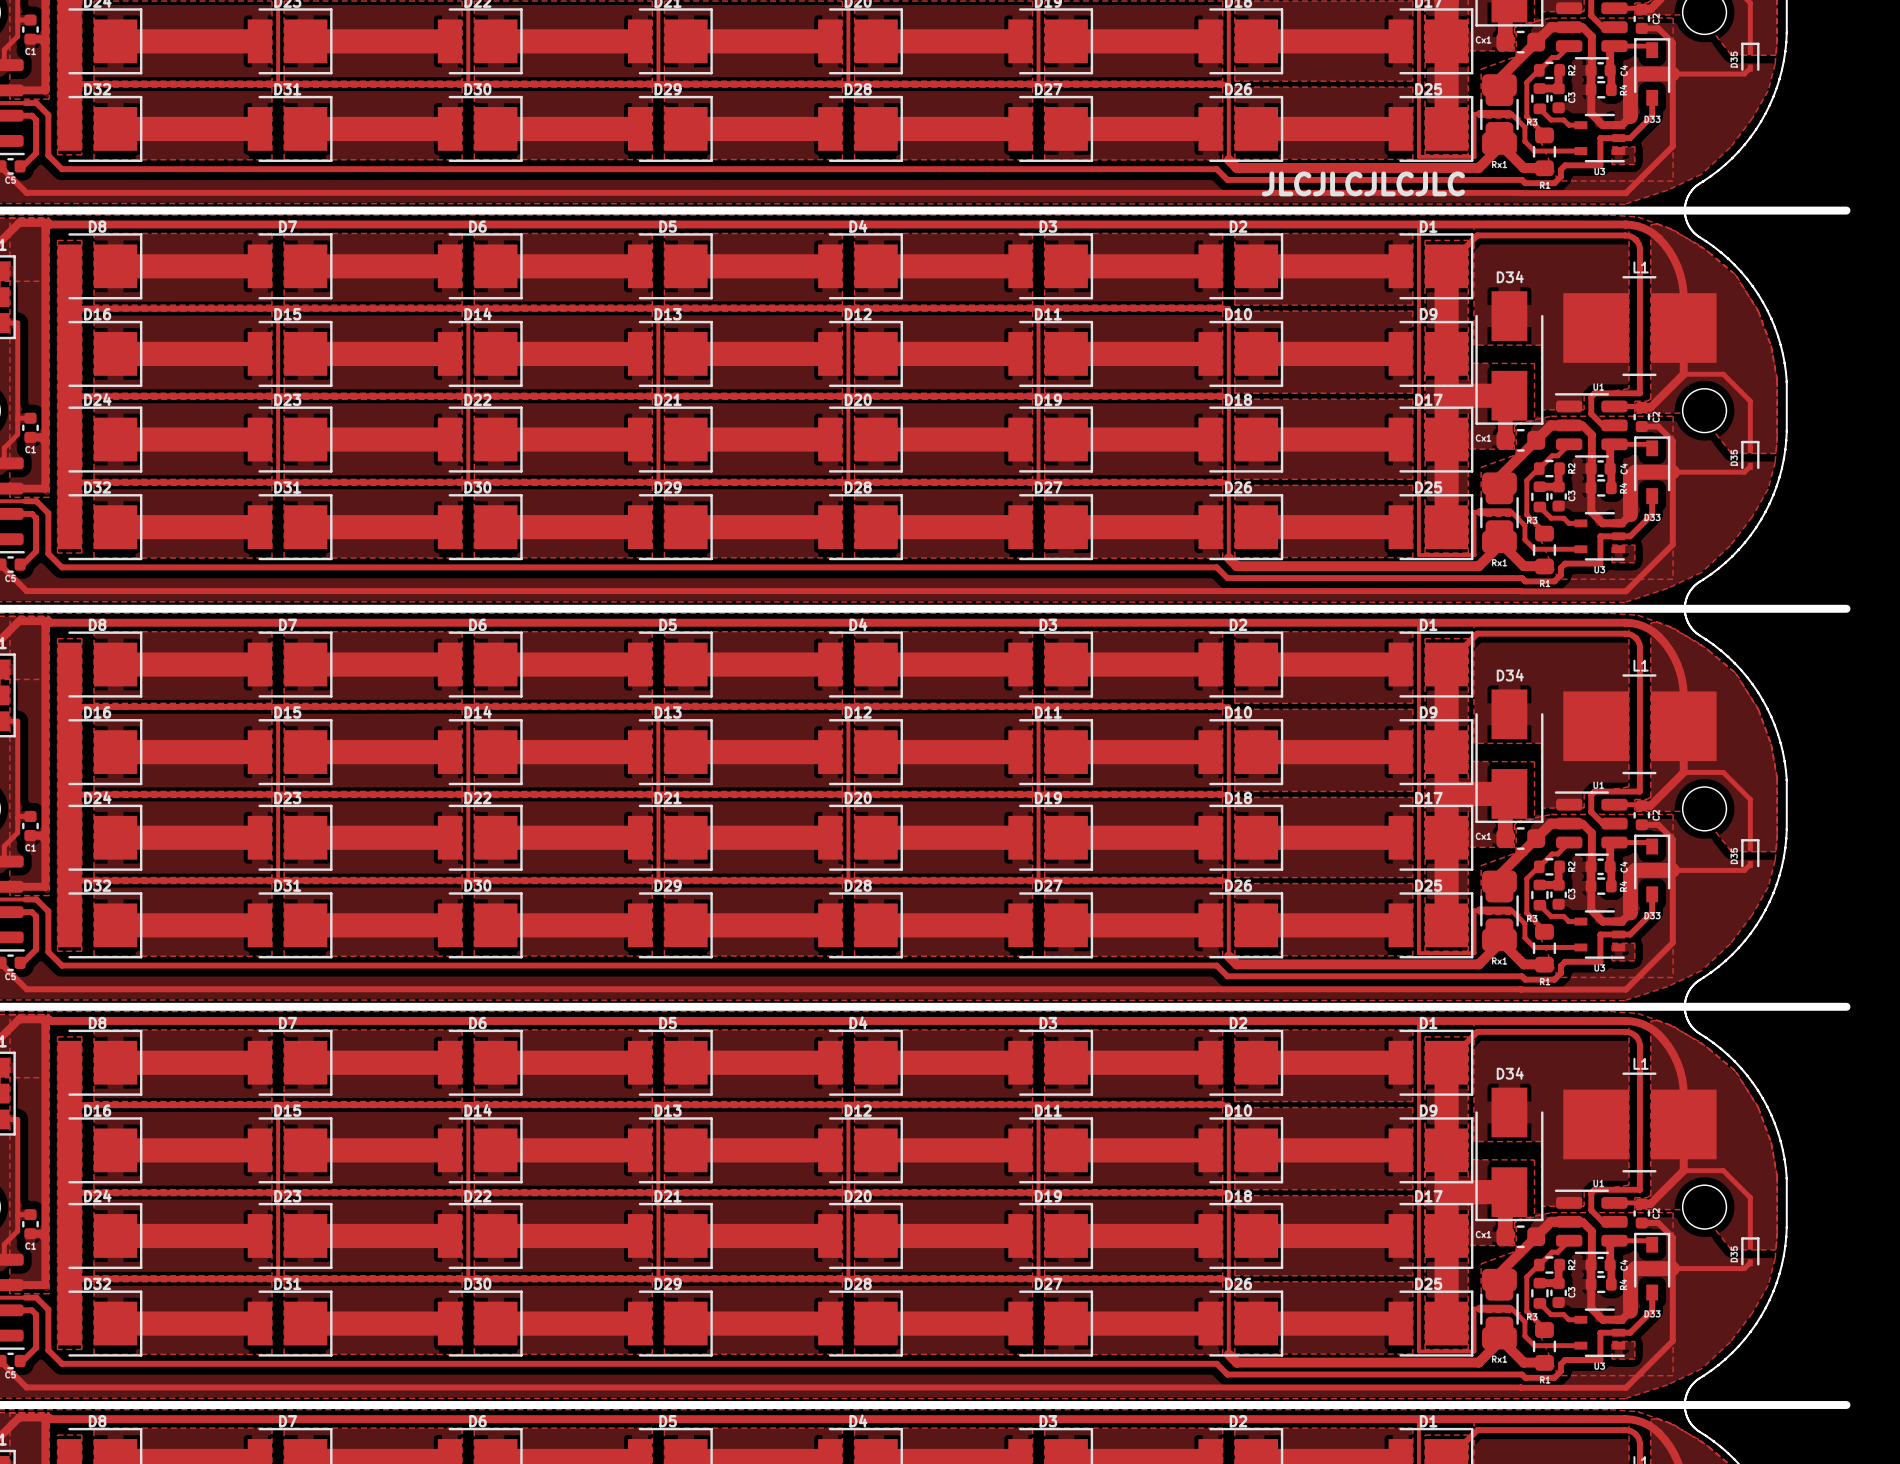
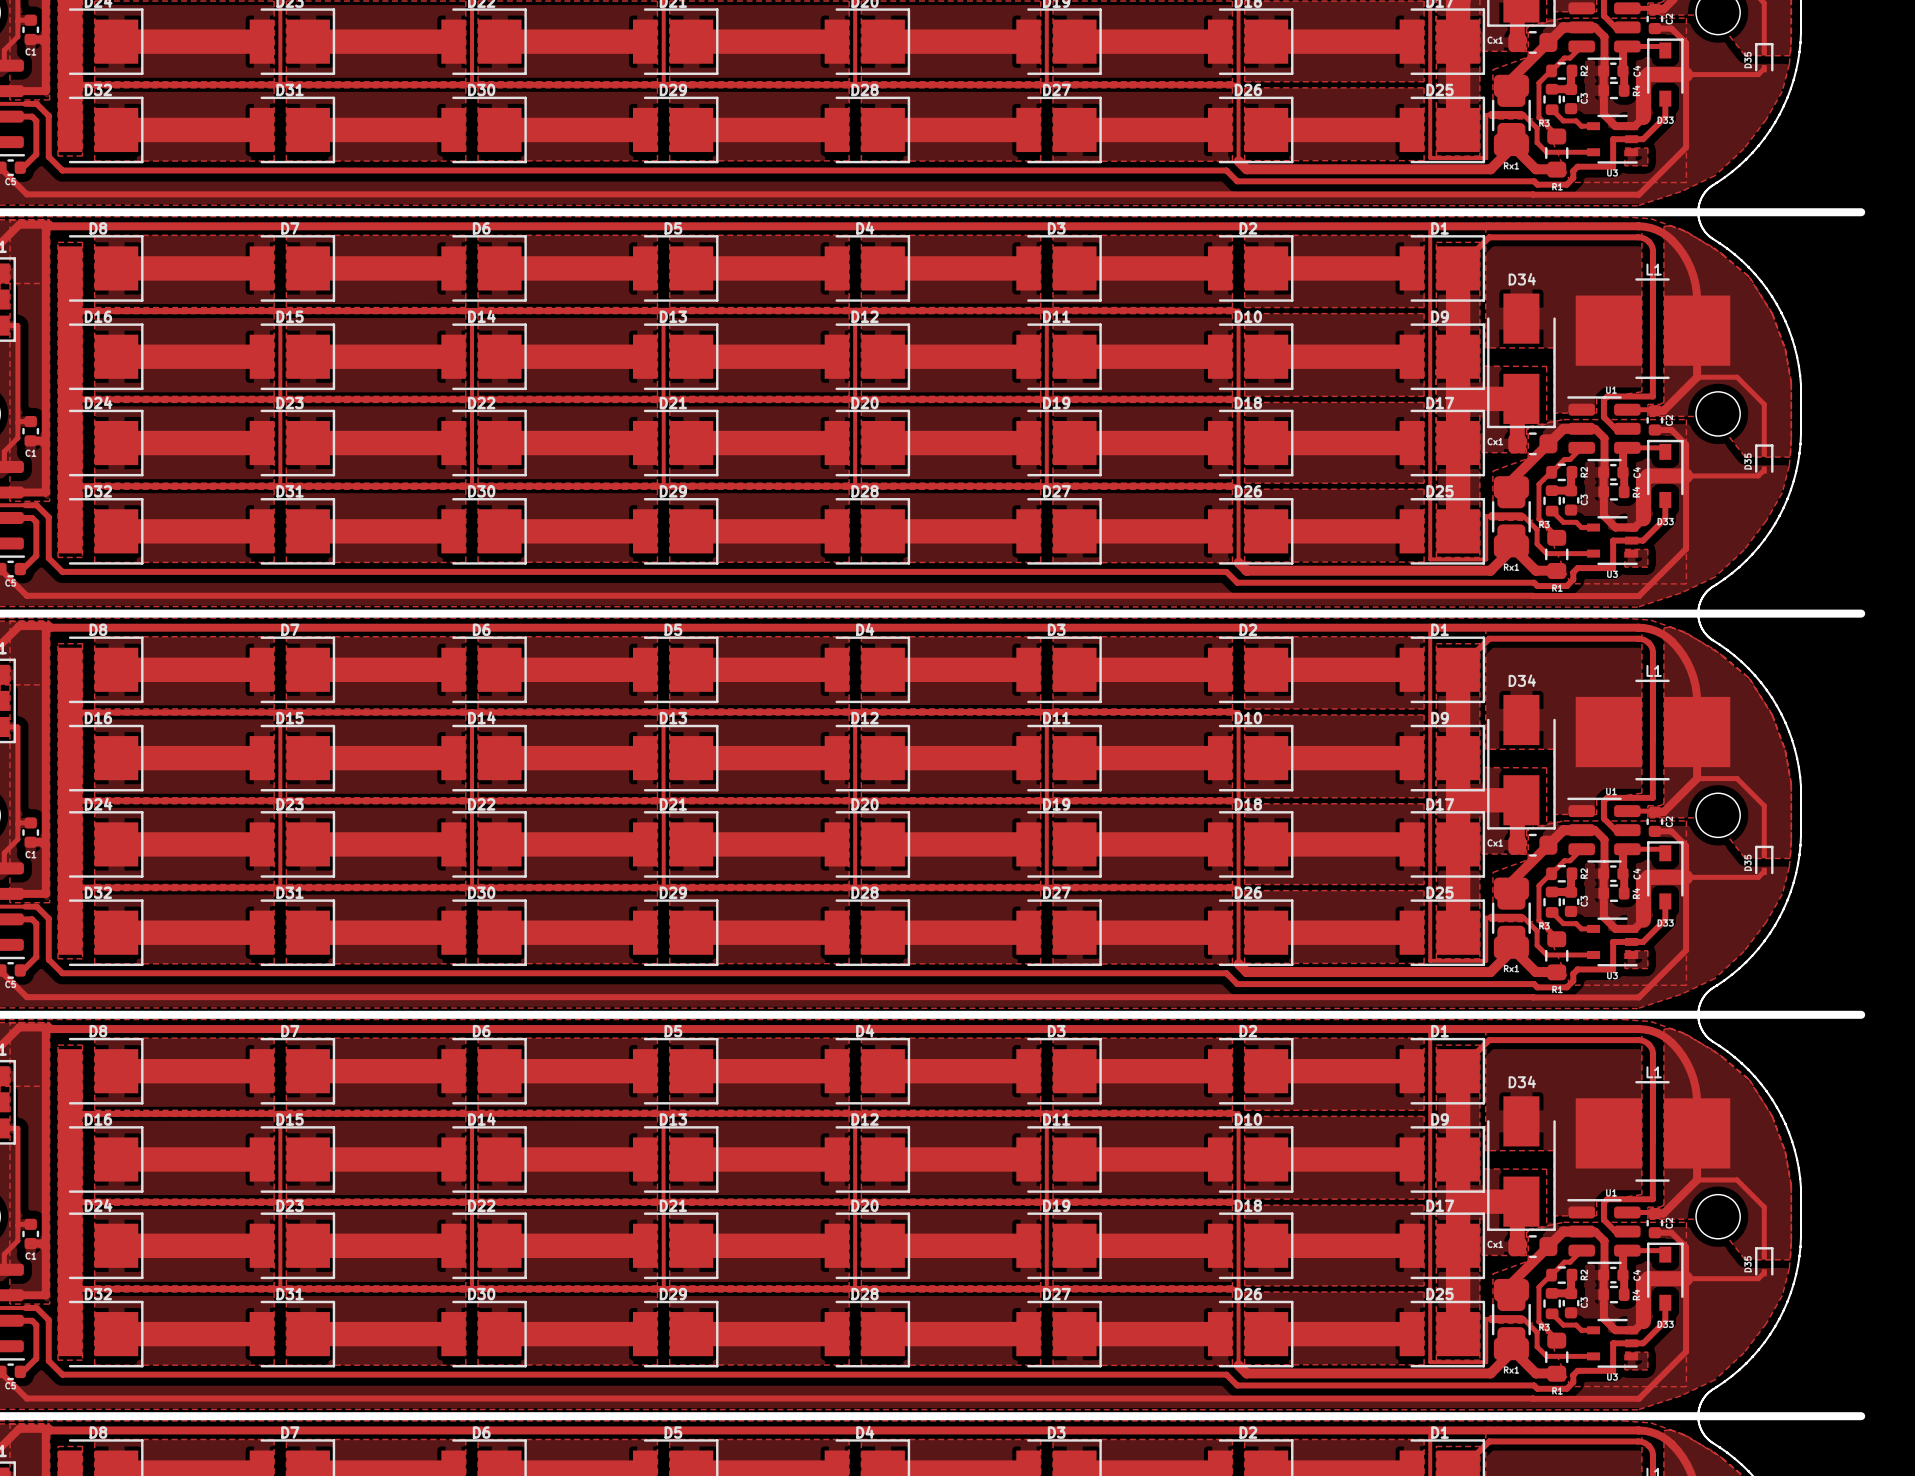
text: JLCJLCJLCJLC (1363, 183) -> none

